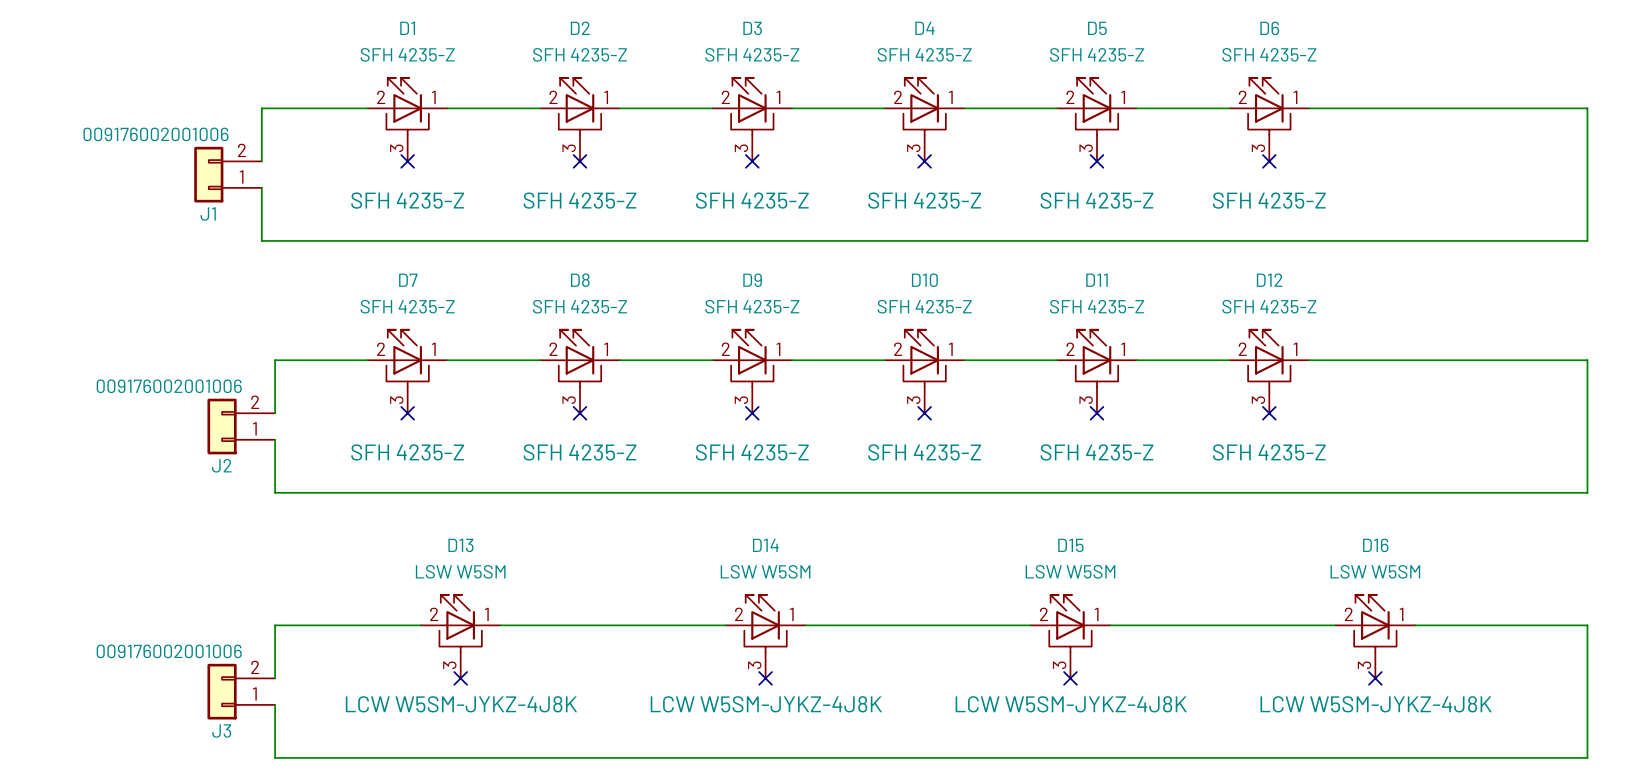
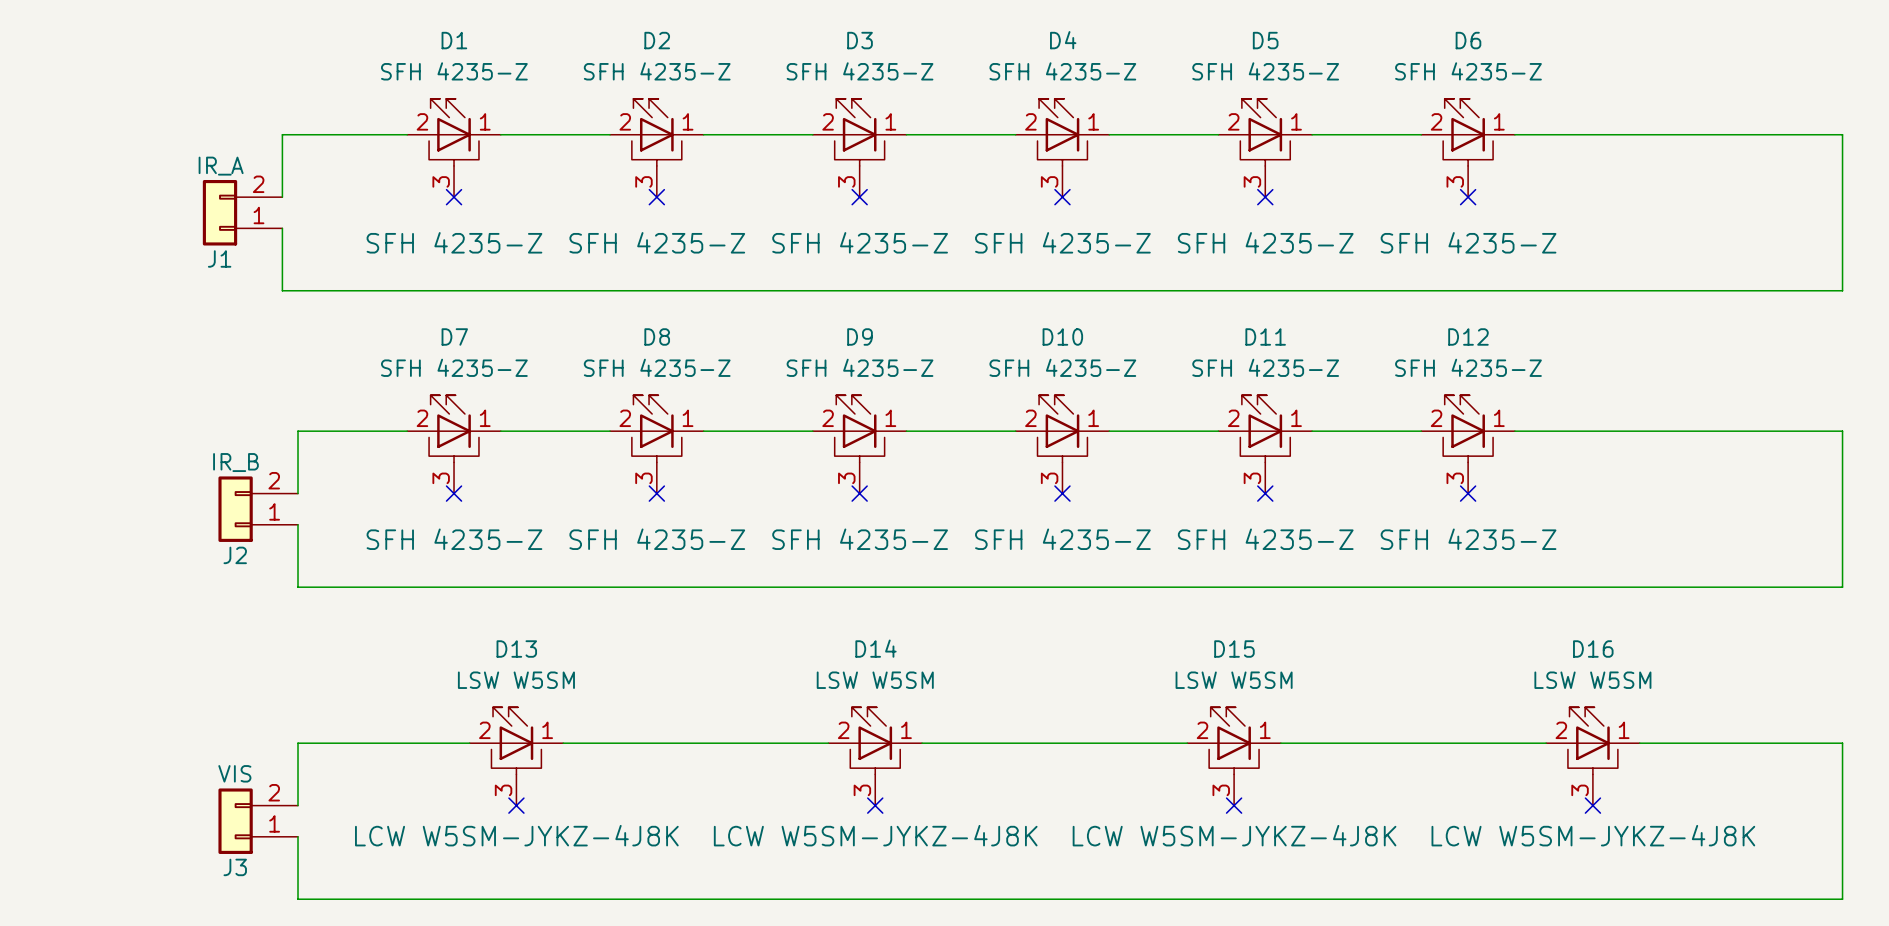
J1 value: 009176002001006 (155, 134) -> IR_A (221, 166)
J2 value: 009176002001006 (169, 386) -> IR_B (235, 462)
J3 value: 009176002001006 (169, 651) -> VIS (234, 773)

